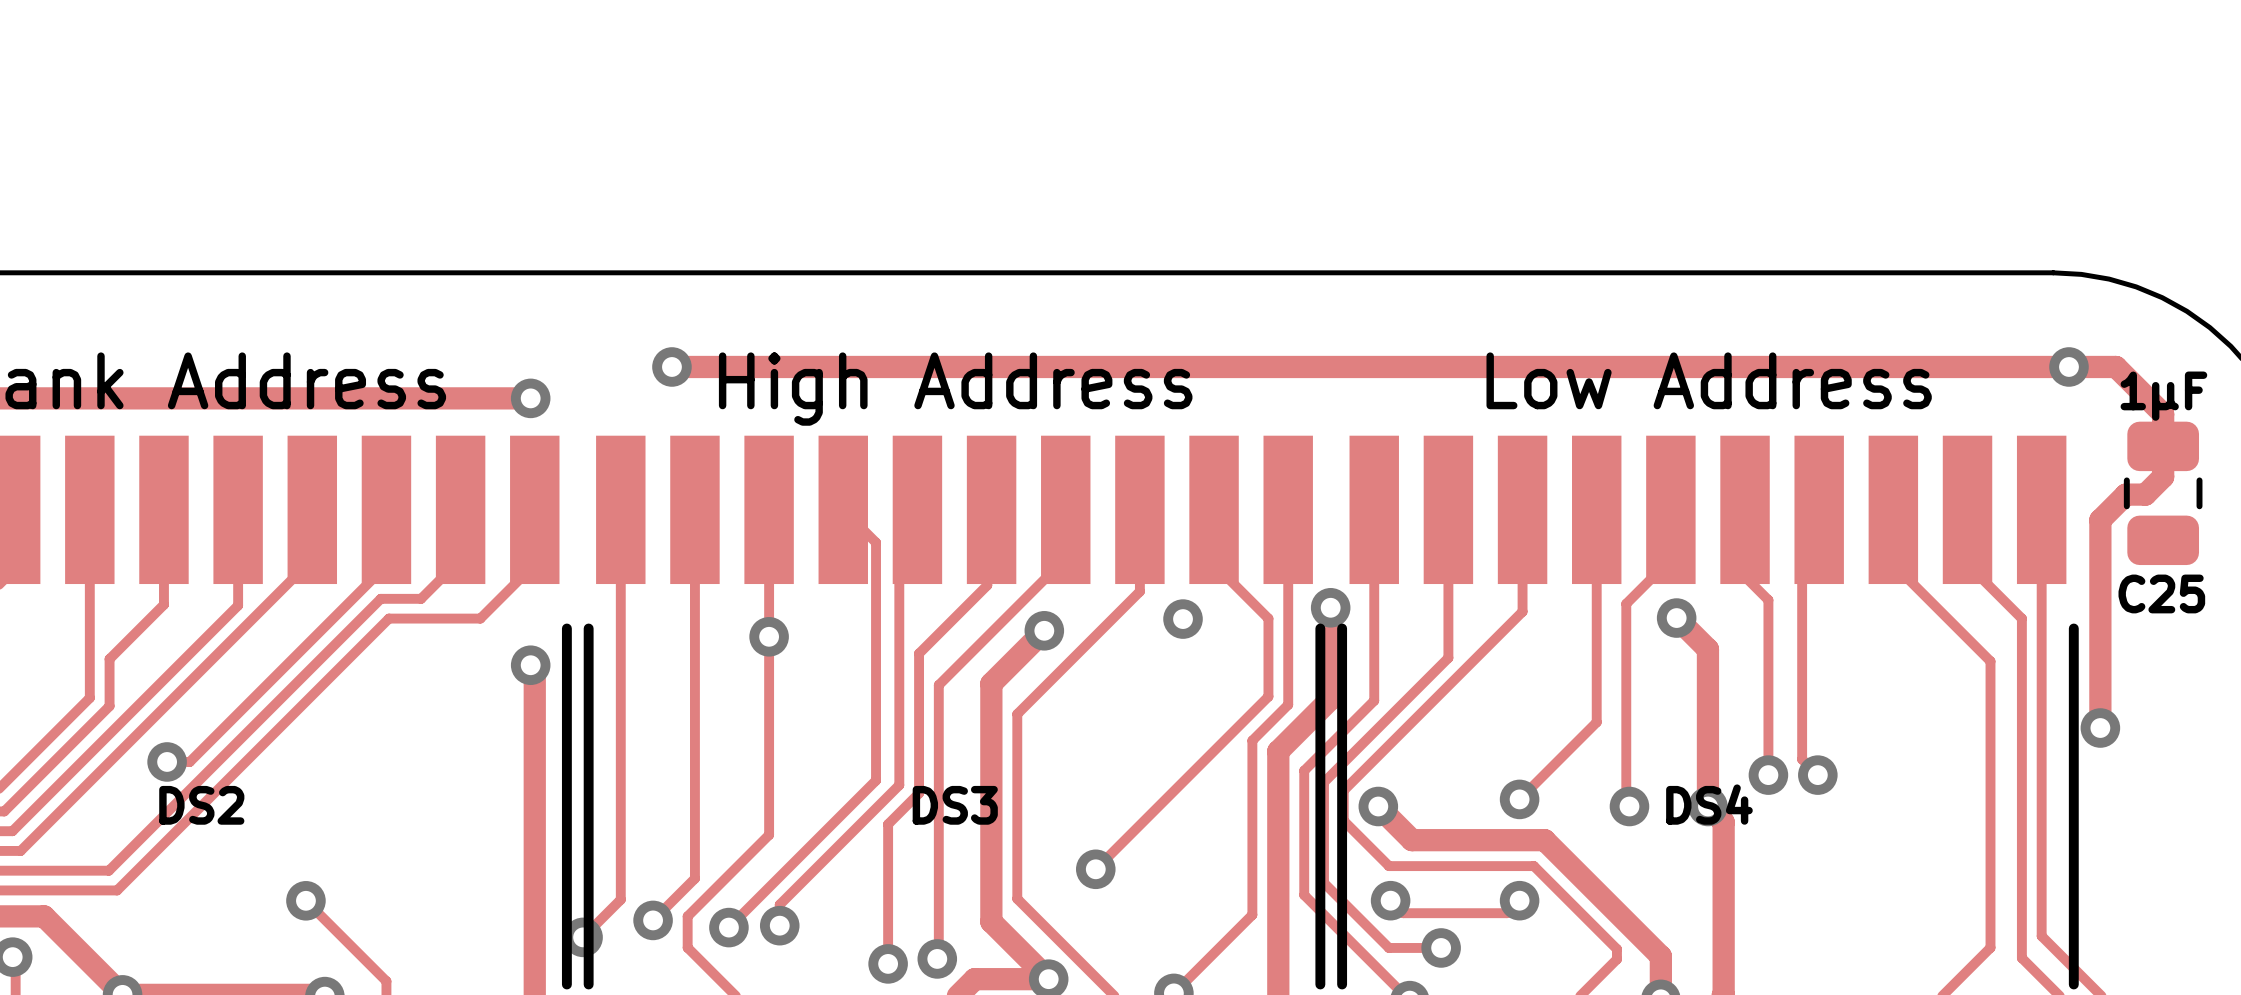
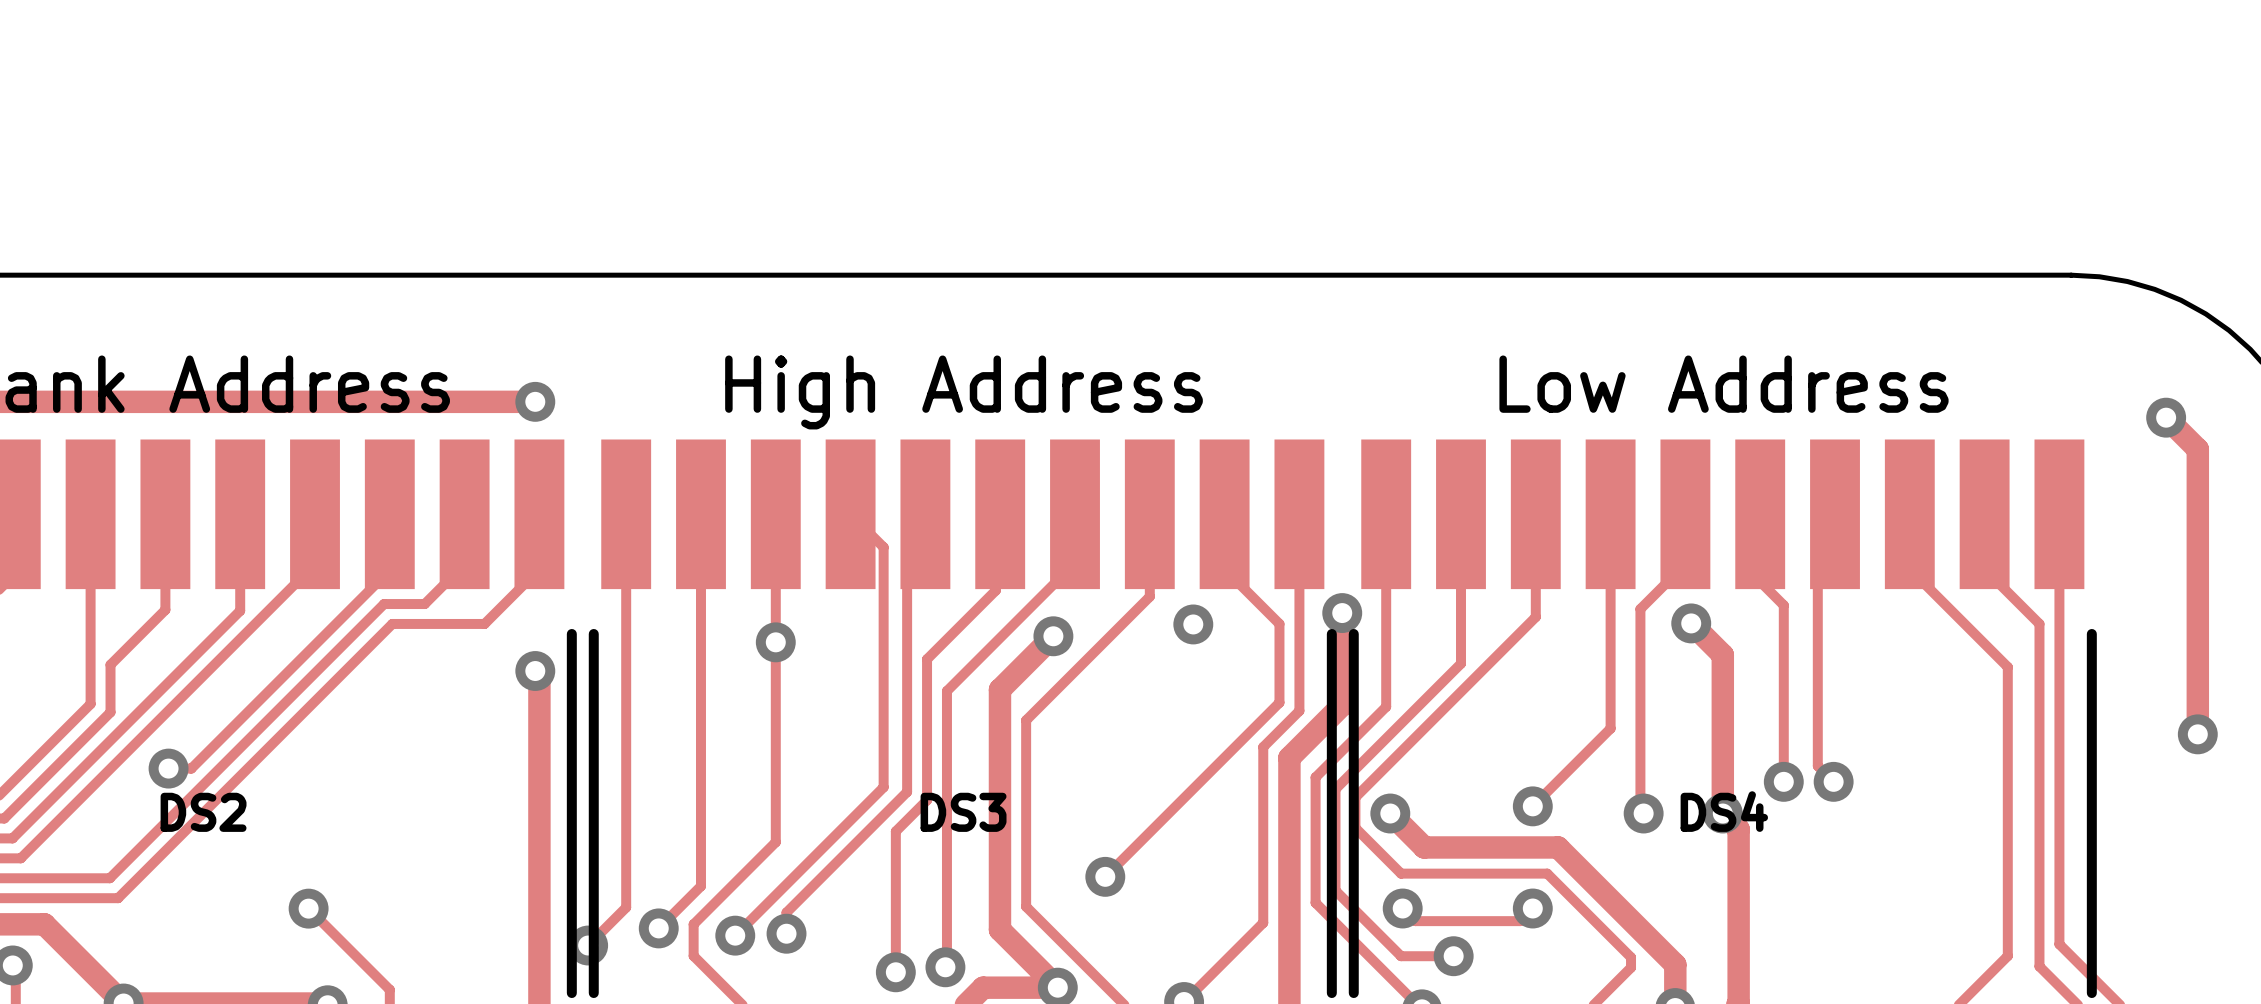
track: (671, 366) (2116, 366) (2163, 414) (2163, 476) (2145, 494) (2125, 494) (2100, 520) (2100, 728) -> none
via: (671, 366) -> none
via position: (2068, 366) -> (2166, 417)
track: none -> (2166, 417) (2197, 449) (2197, 734)
C25: (2163, 493) -> none
via position: (2100, 728) -> (2197, 734)

